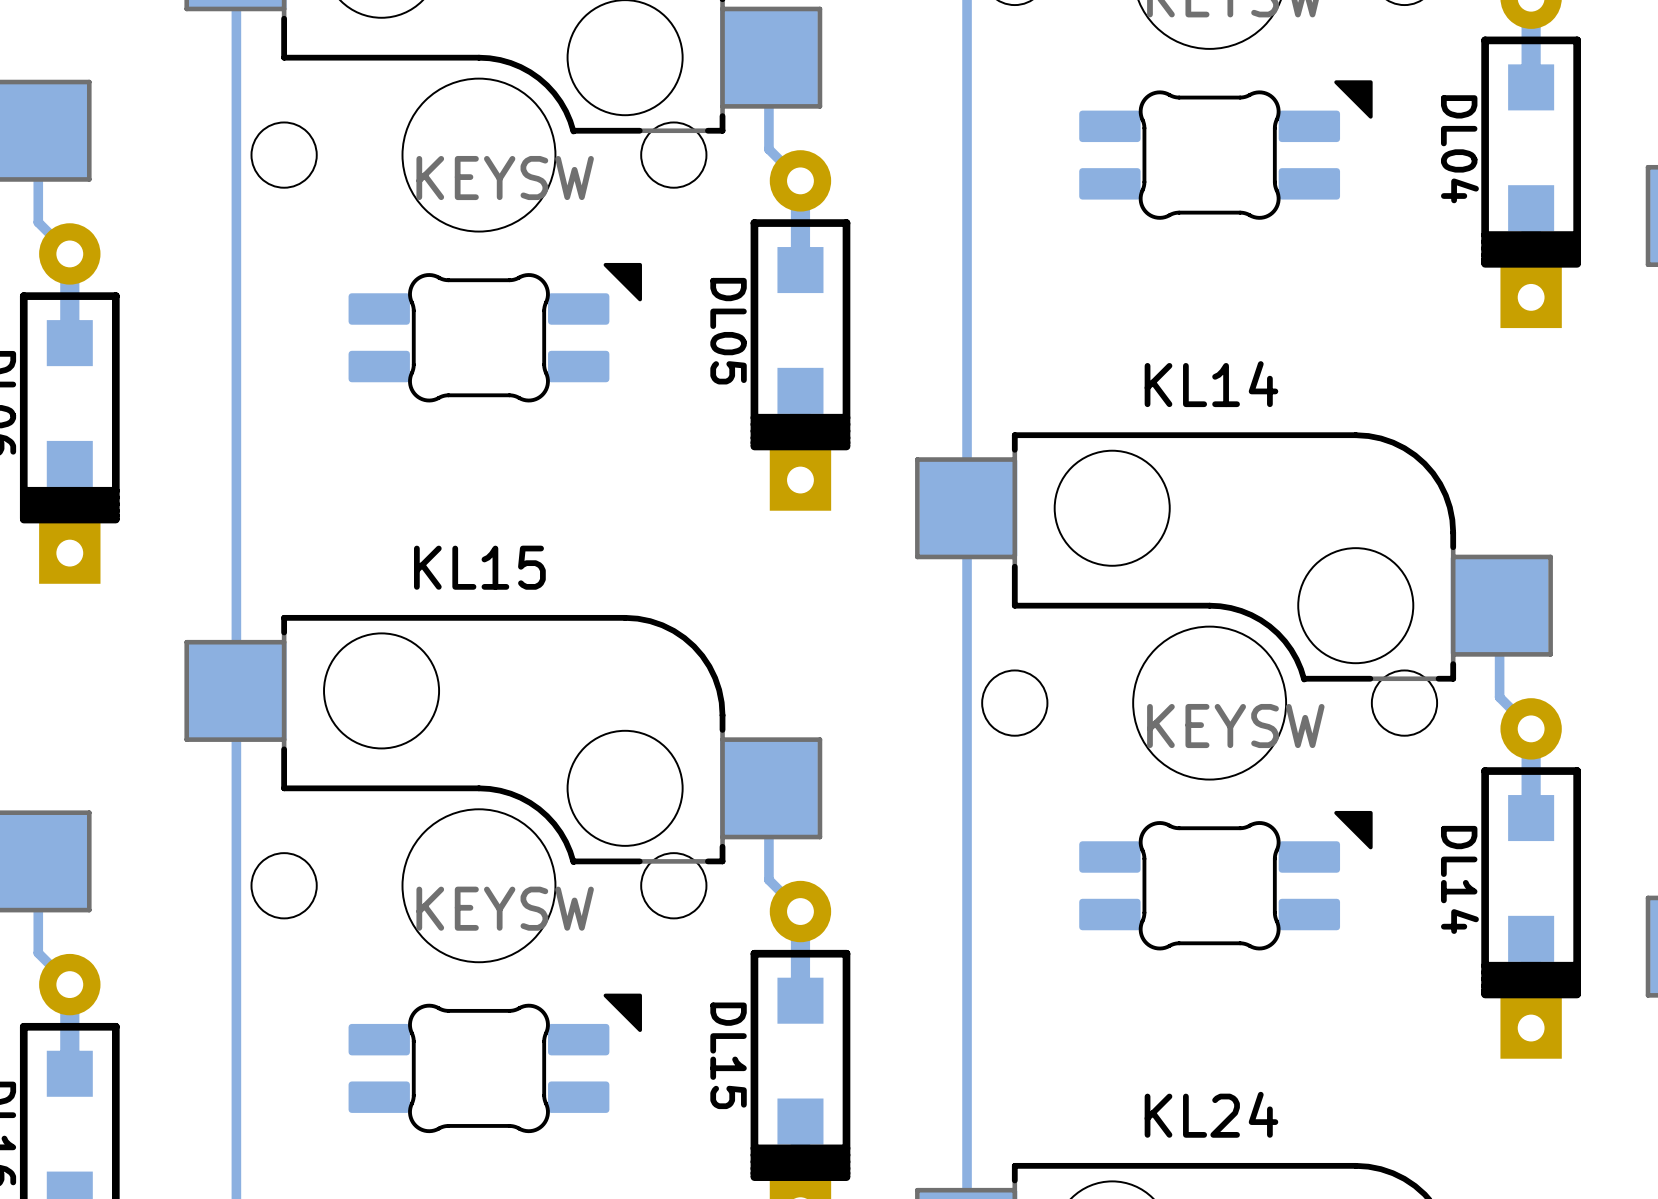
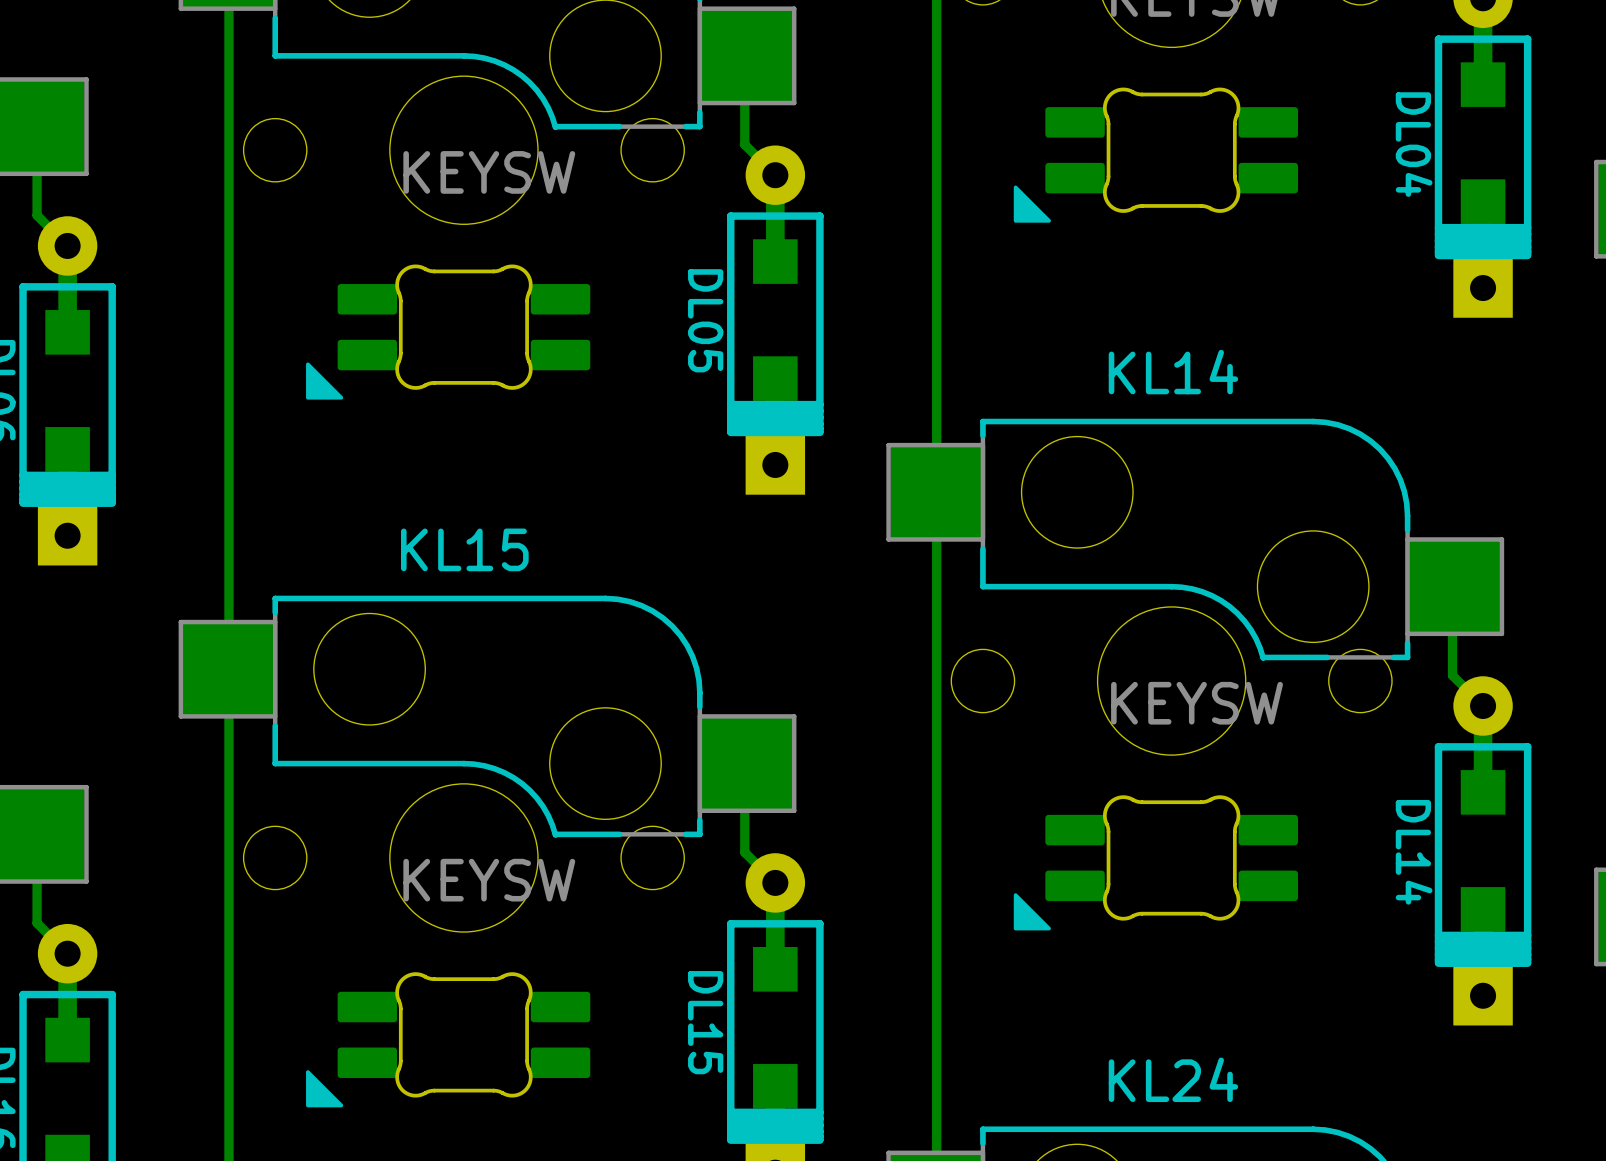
part rotation: 0° (1225, 150) -> 180° (1155, 155)
part rotation: 0° (495, 332) -> 180° (448, 332)
part rotation: 0° (1225, 880) -> 180° (1155, 862)
part rotation: 0° (495, 1063) -> 180° (448, 1039)

